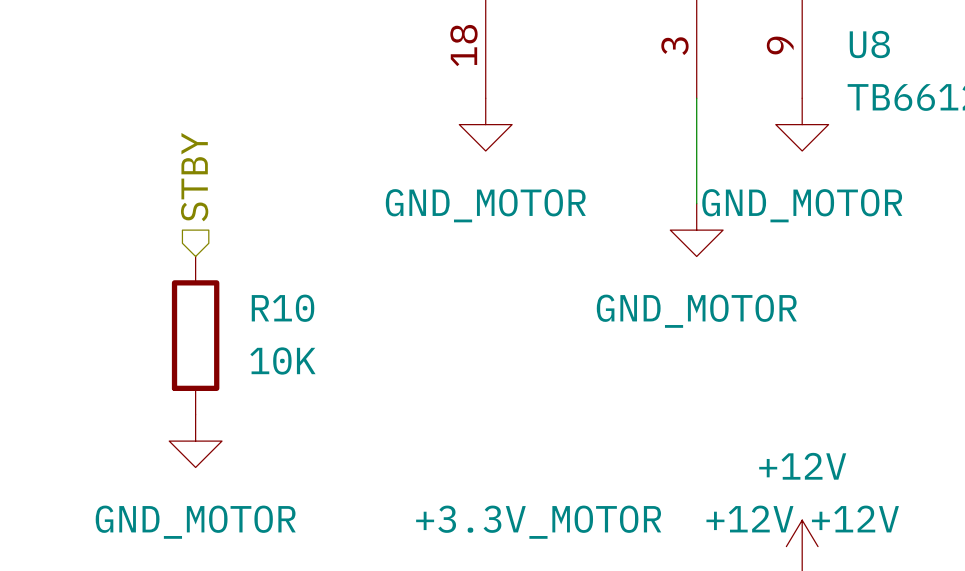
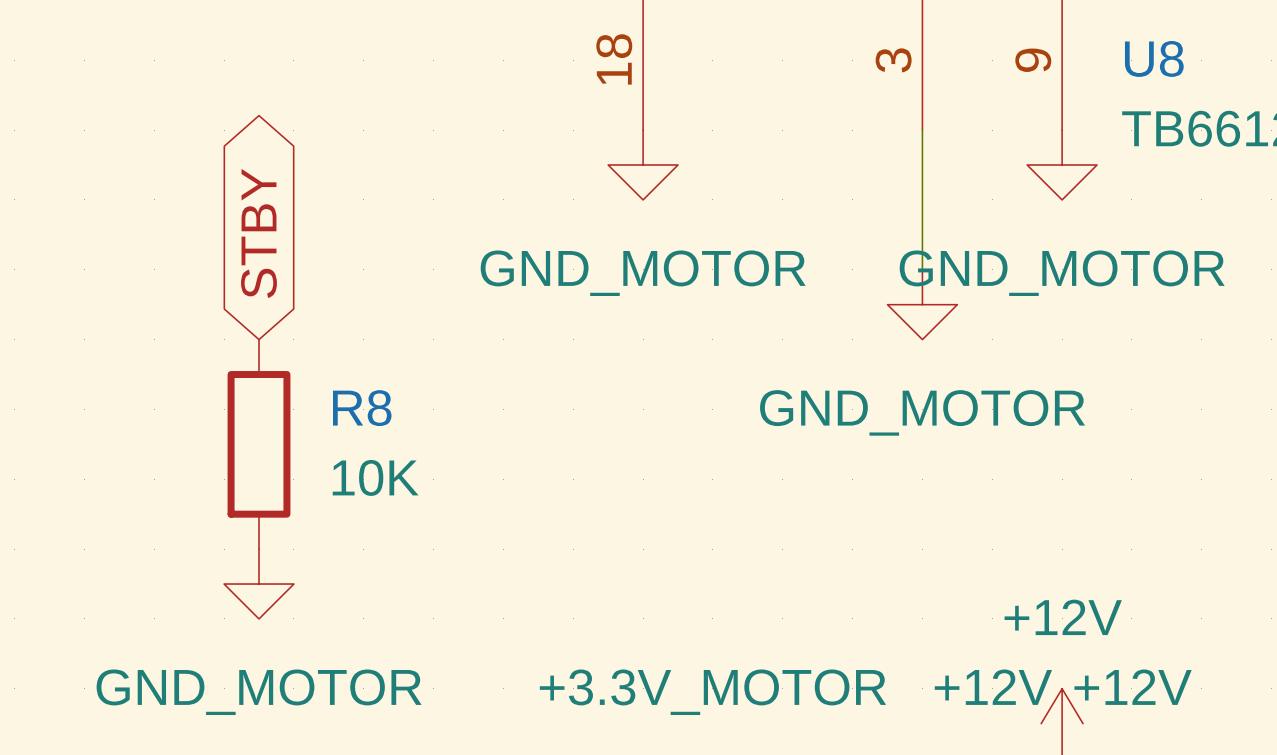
hierarchical label: STBY (194, 177) -> none
global label: none -> STBY (258, 233)
R10 name: R10 (283, 308) -> R8 (362, 408)

